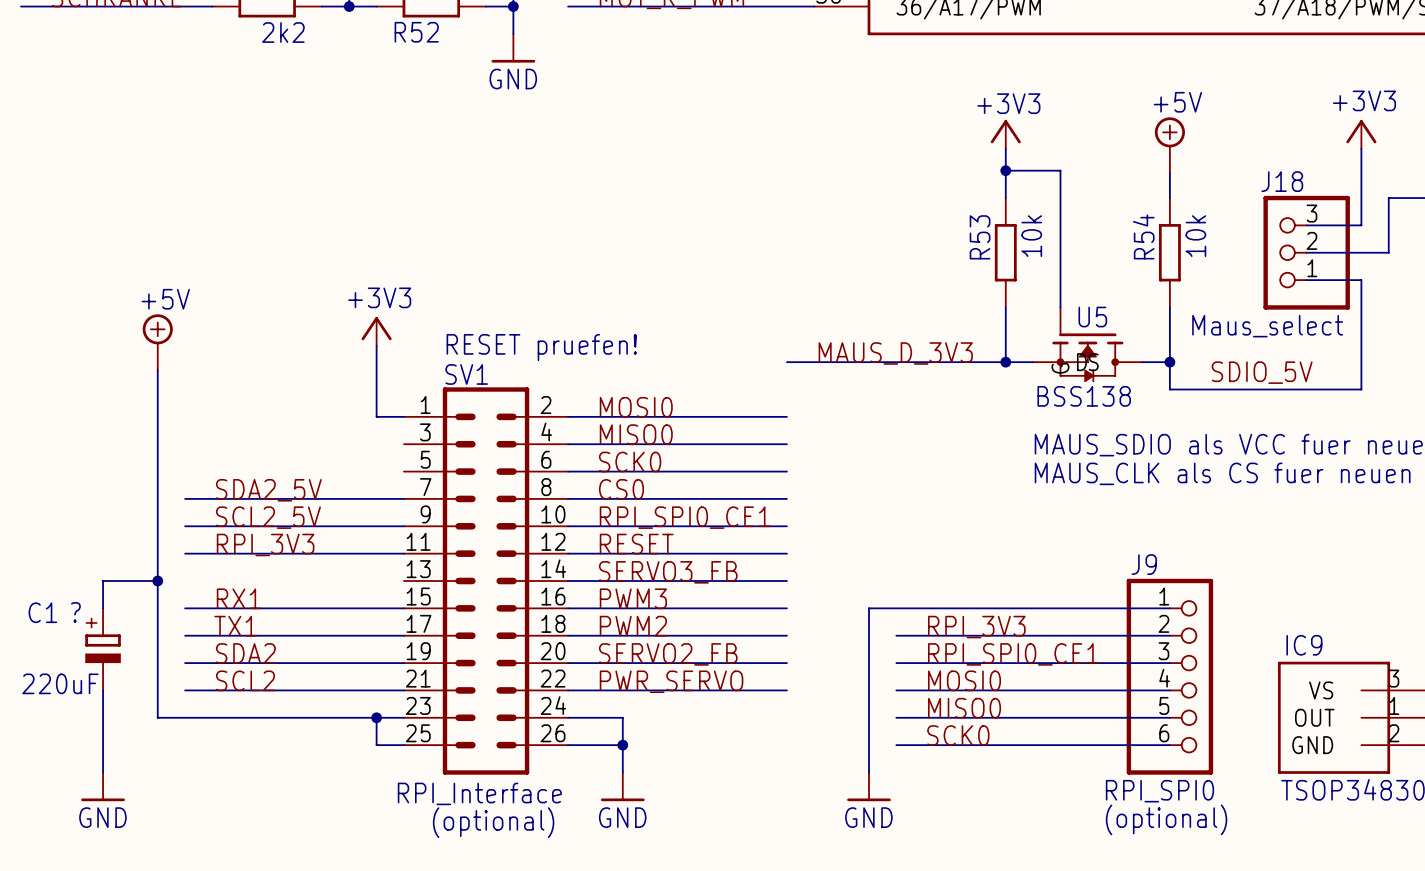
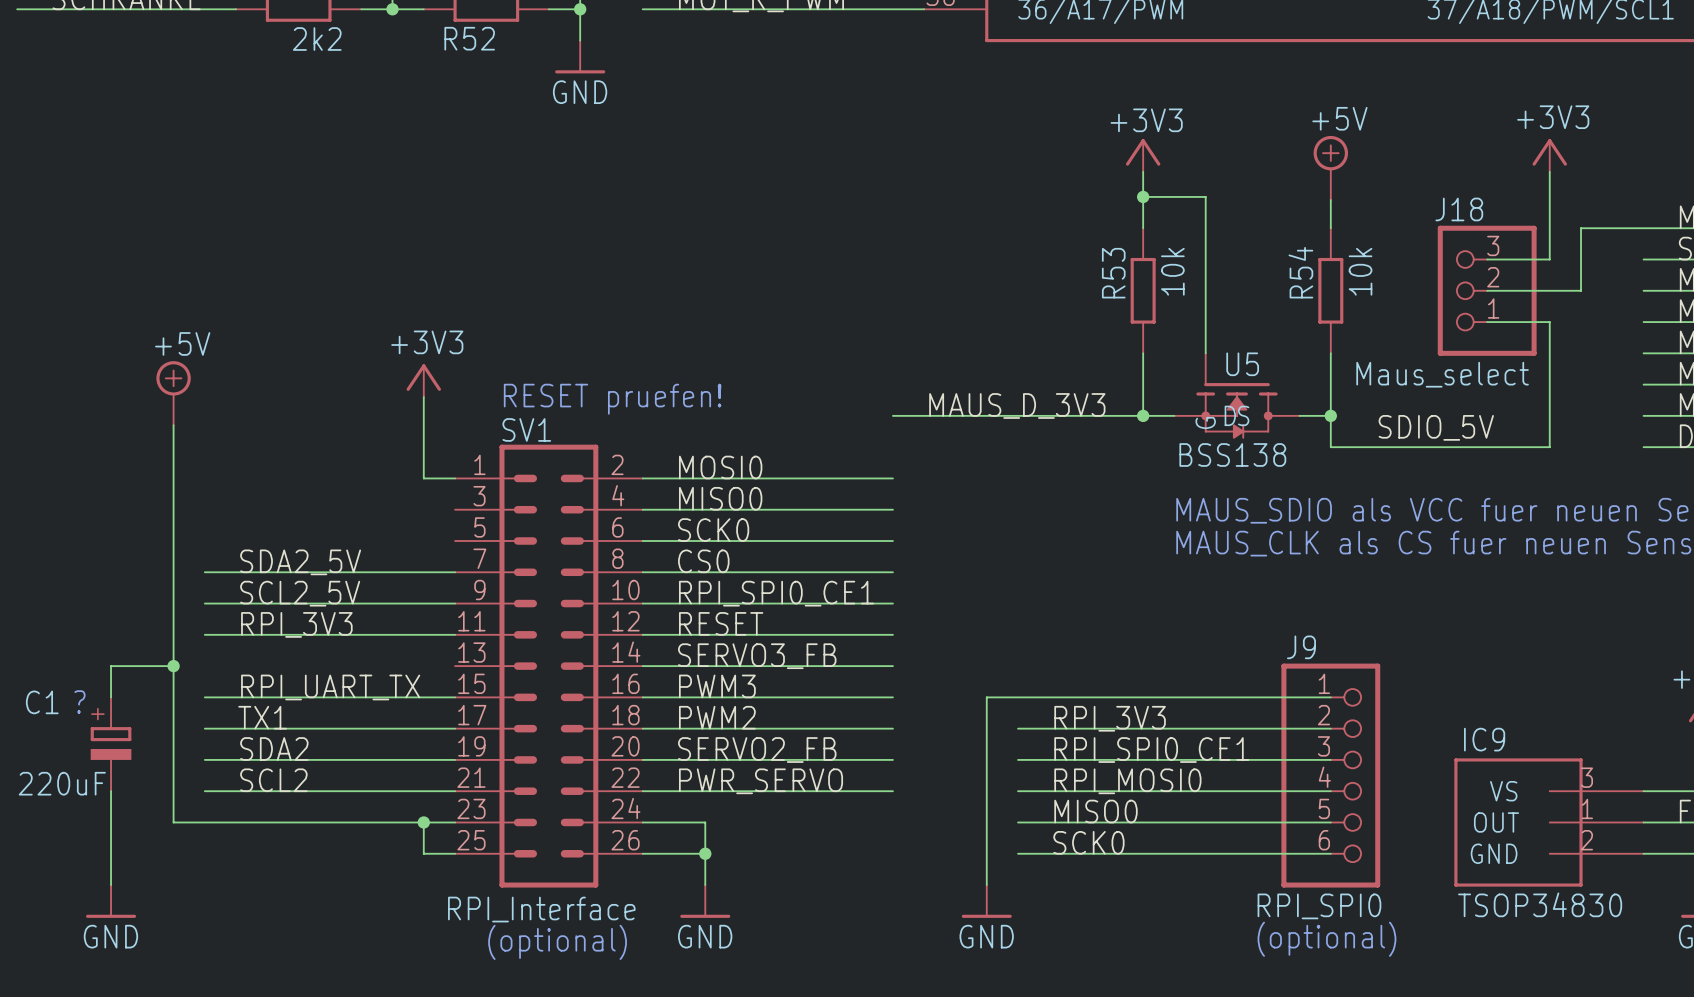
label: RX1 (238, 598) -> RPI_UART_TX (330, 687)
label: MOSI0 (964, 680) -> RPI_MOSI0 (1127, 781)

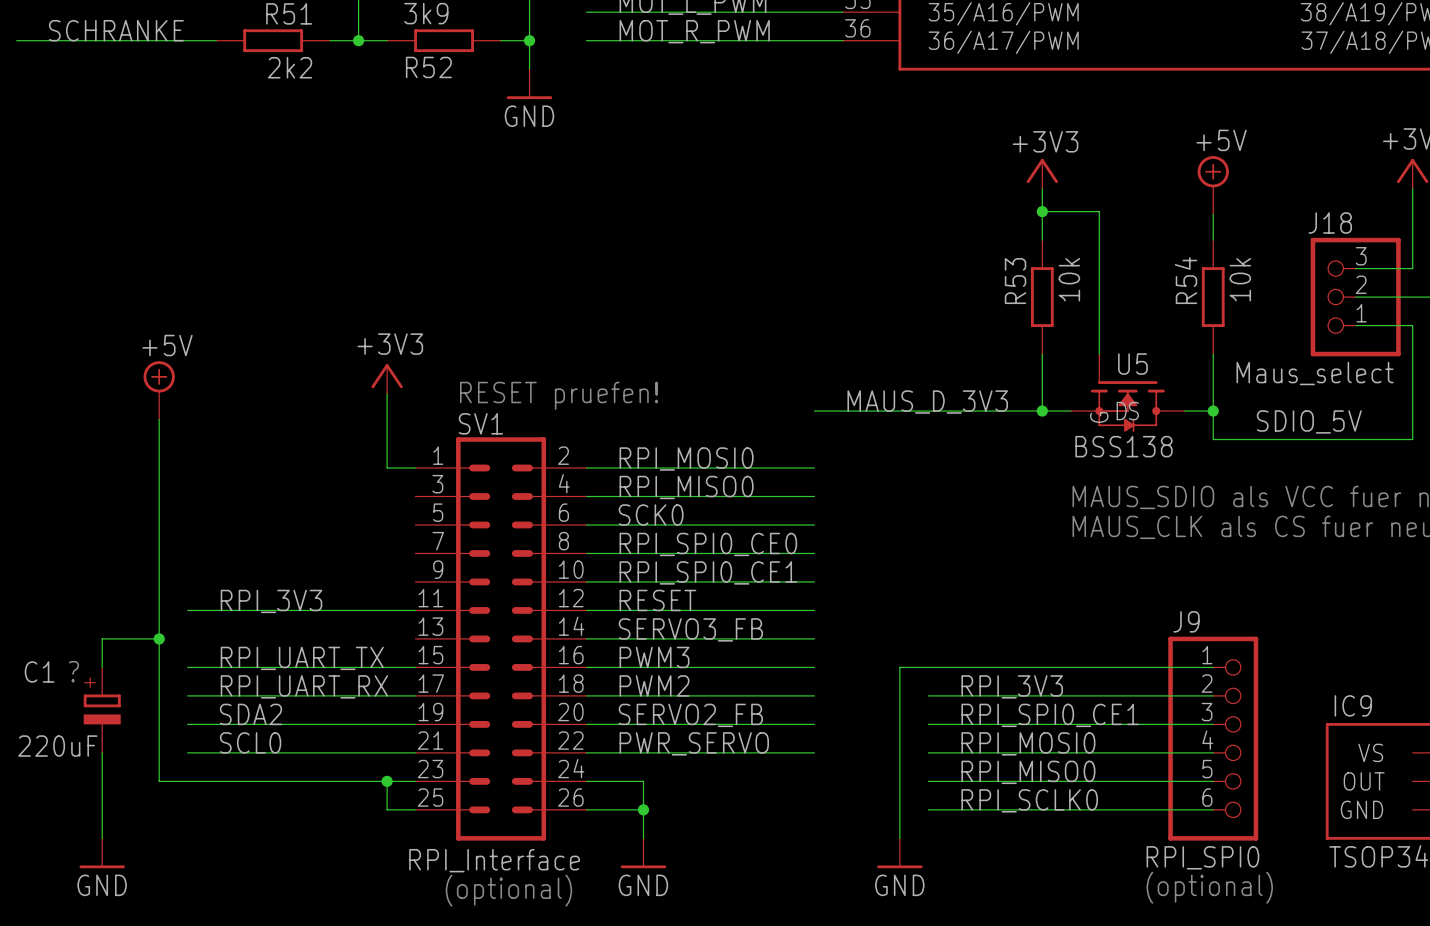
label: MOSI0 (720, 467) -> RPI_MOSI0 (686, 458)
label: MISO0 (720, 498) -> RPI_MISO0 (686, 487)
label: CS0 (703, 561) -> RPI_SPI0_CE0 (708, 544)
label: SDA2_5V (300, 562) -> none
wire: (204, 572) (455, 572) -> none
label: SCL2_5V (300, 593) -> none
wire: (204, 603) (455, 603) -> none
label: TX1 (262, 717) -> RPI_UART_RX (304, 686)
label: SCL2 (273, 780) -> SCL0 (250, 742)
label: MISO0 (1095, 811) -> RPI_MISO0 (1028, 772)
label: SCK0 (1088, 842) -> RPI_SCLK0 (1029, 800)

